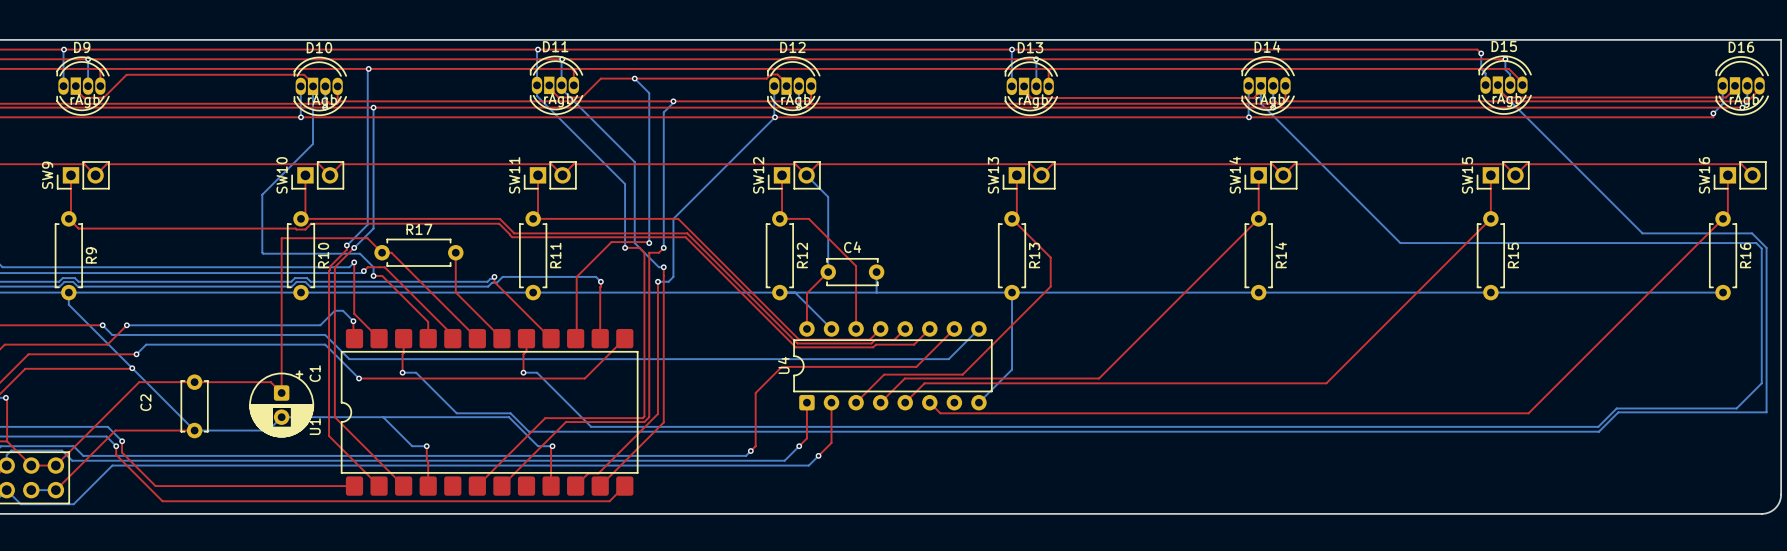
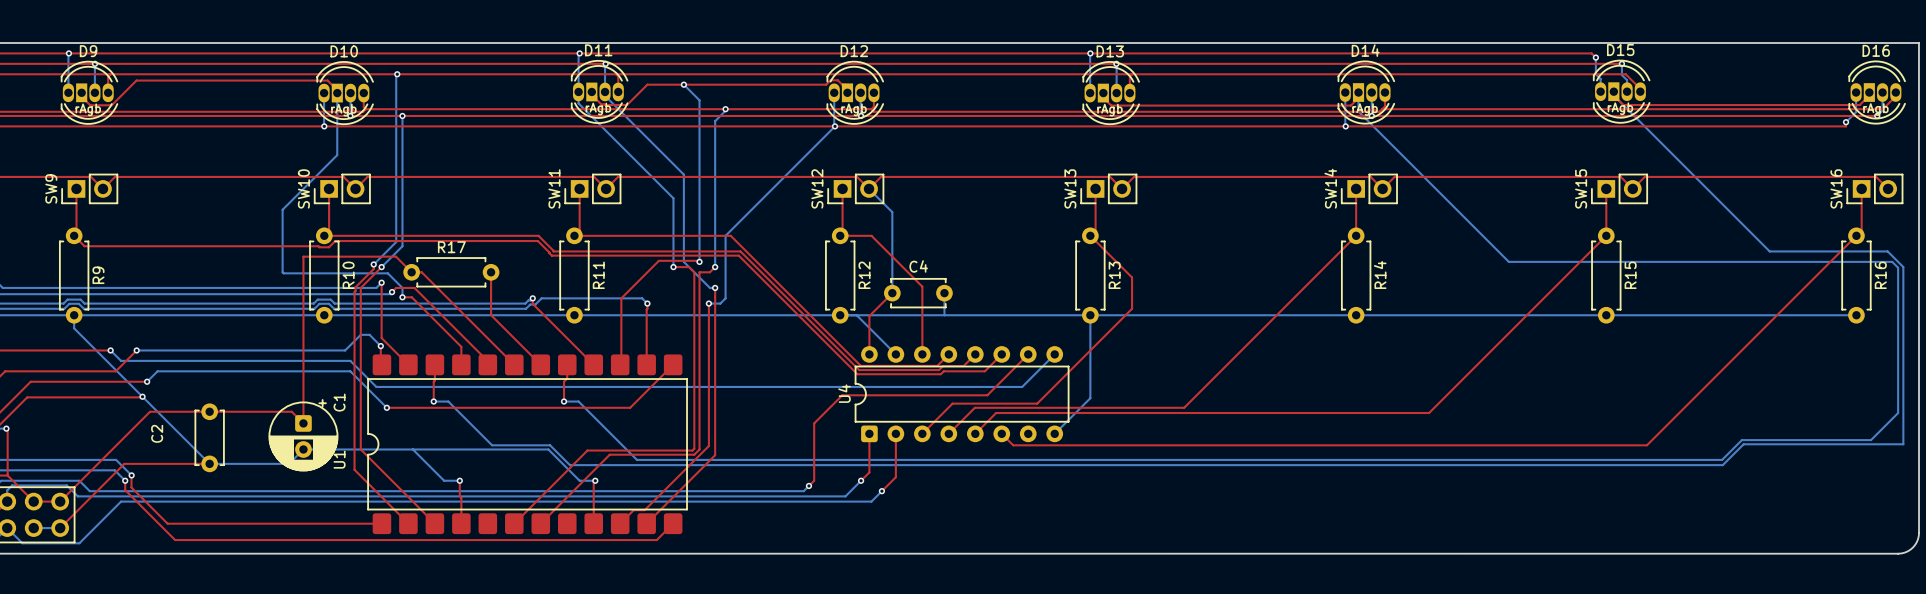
D11 footprint: [530, 55, 583, 115] -> [571, 60, 629, 124]
D15 footprint: [1478, 55, 1532, 115] -> [1593, 59, 1651, 124]
D9 footprint: [56, 56, 110, 116] -> [60, 61, 118, 125]
D10 footprint: [293, 56, 347, 116] -> [316, 61, 374, 125]
D12 footprint: [767, 56, 821, 116] -> [826, 61, 884, 125]
D13 footprint: [1004, 56, 1058, 116] -> [1082, 61, 1140, 125]
D14 footprint: [1241, 56, 1295, 116] -> [1337, 60, 1395, 125]
D16 footprint: [1715, 56, 1769, 116] -> [1848, 60, 1906, 125]

